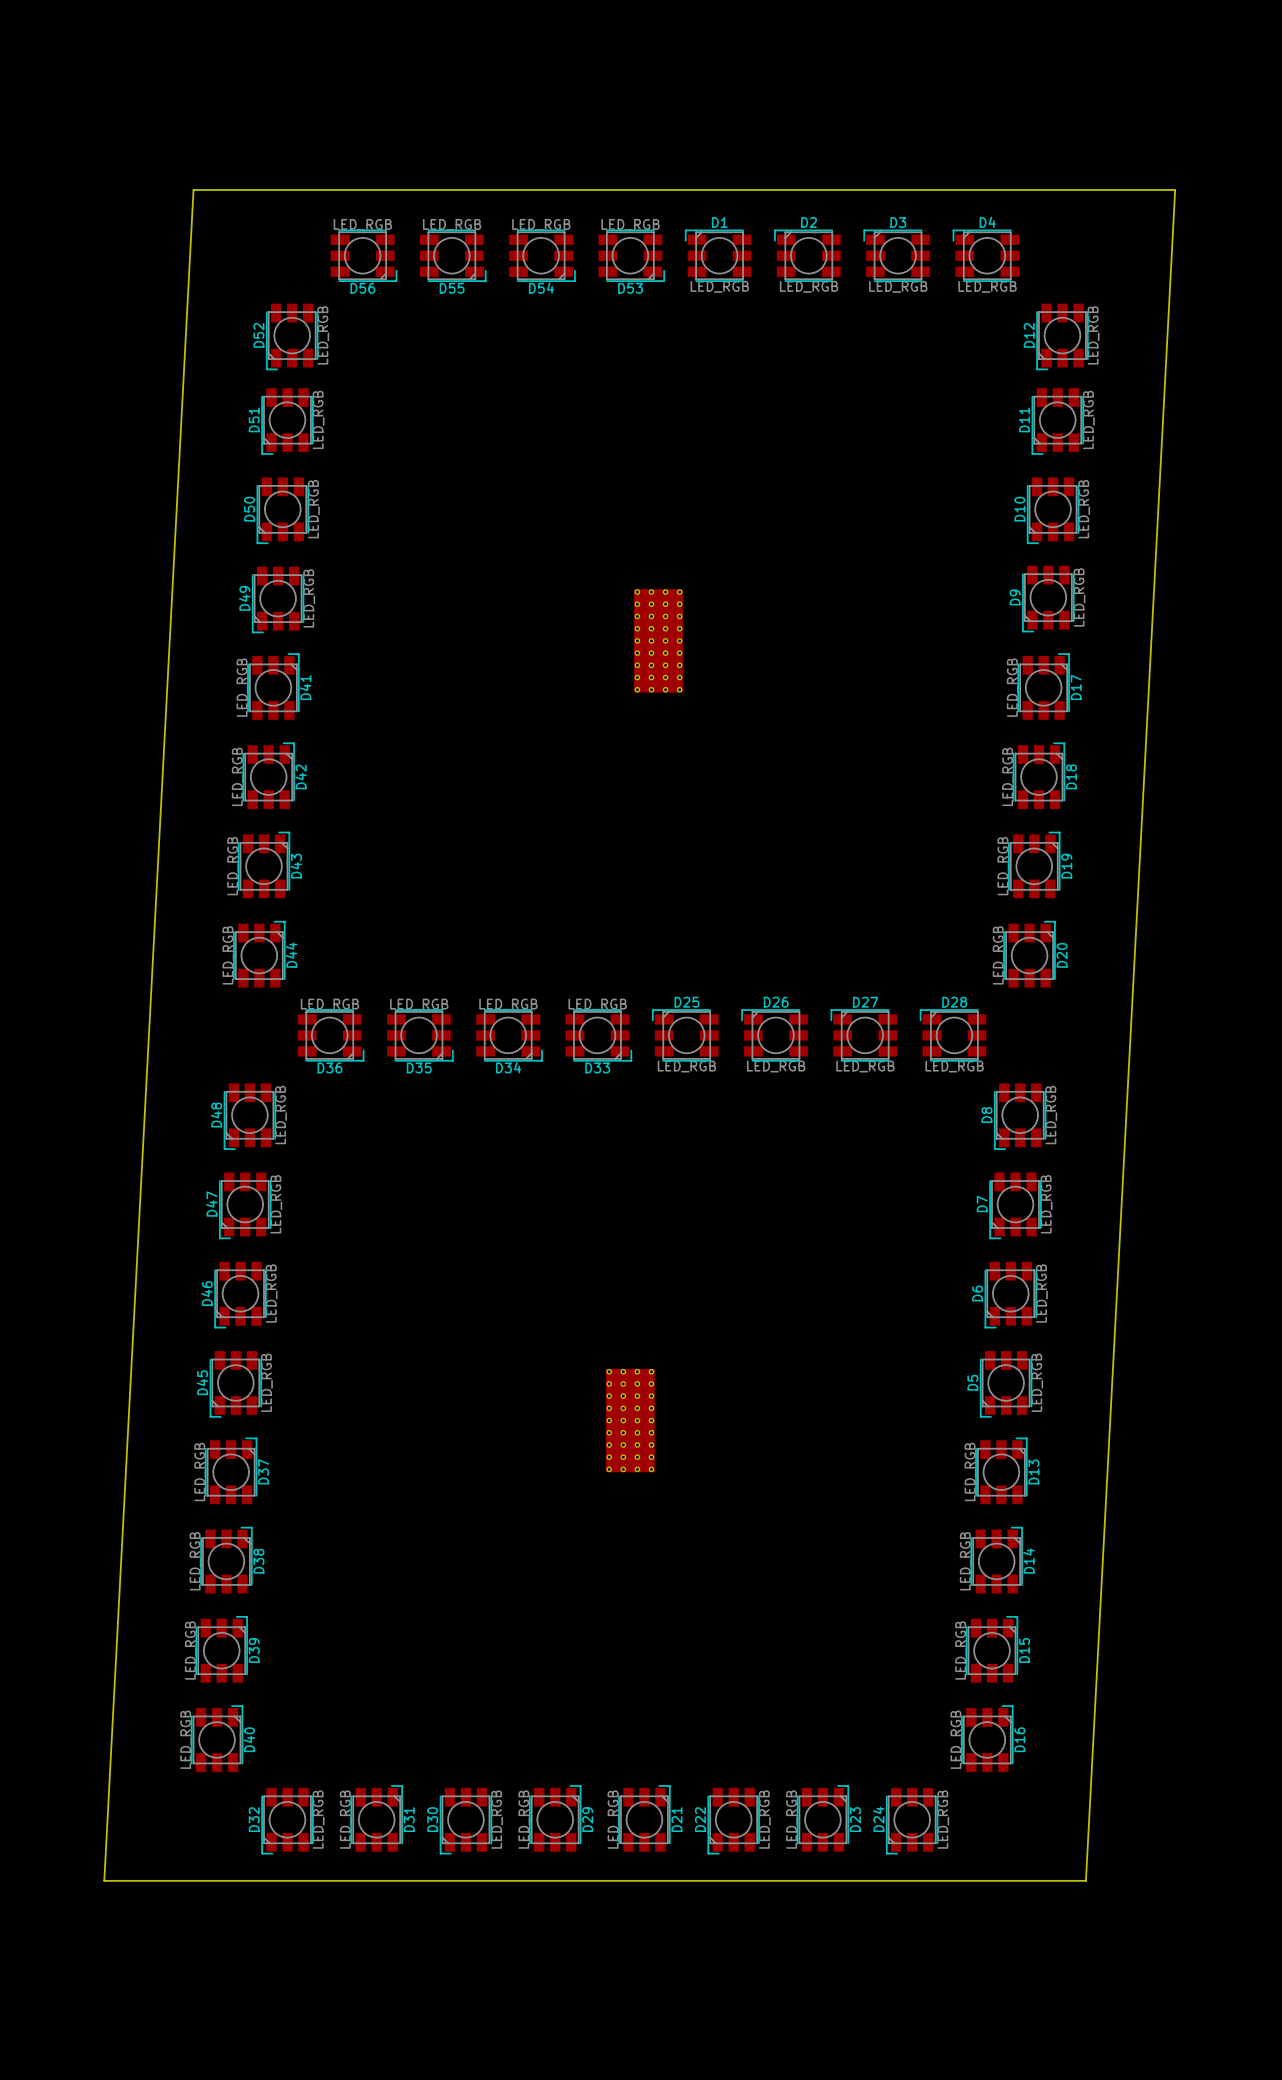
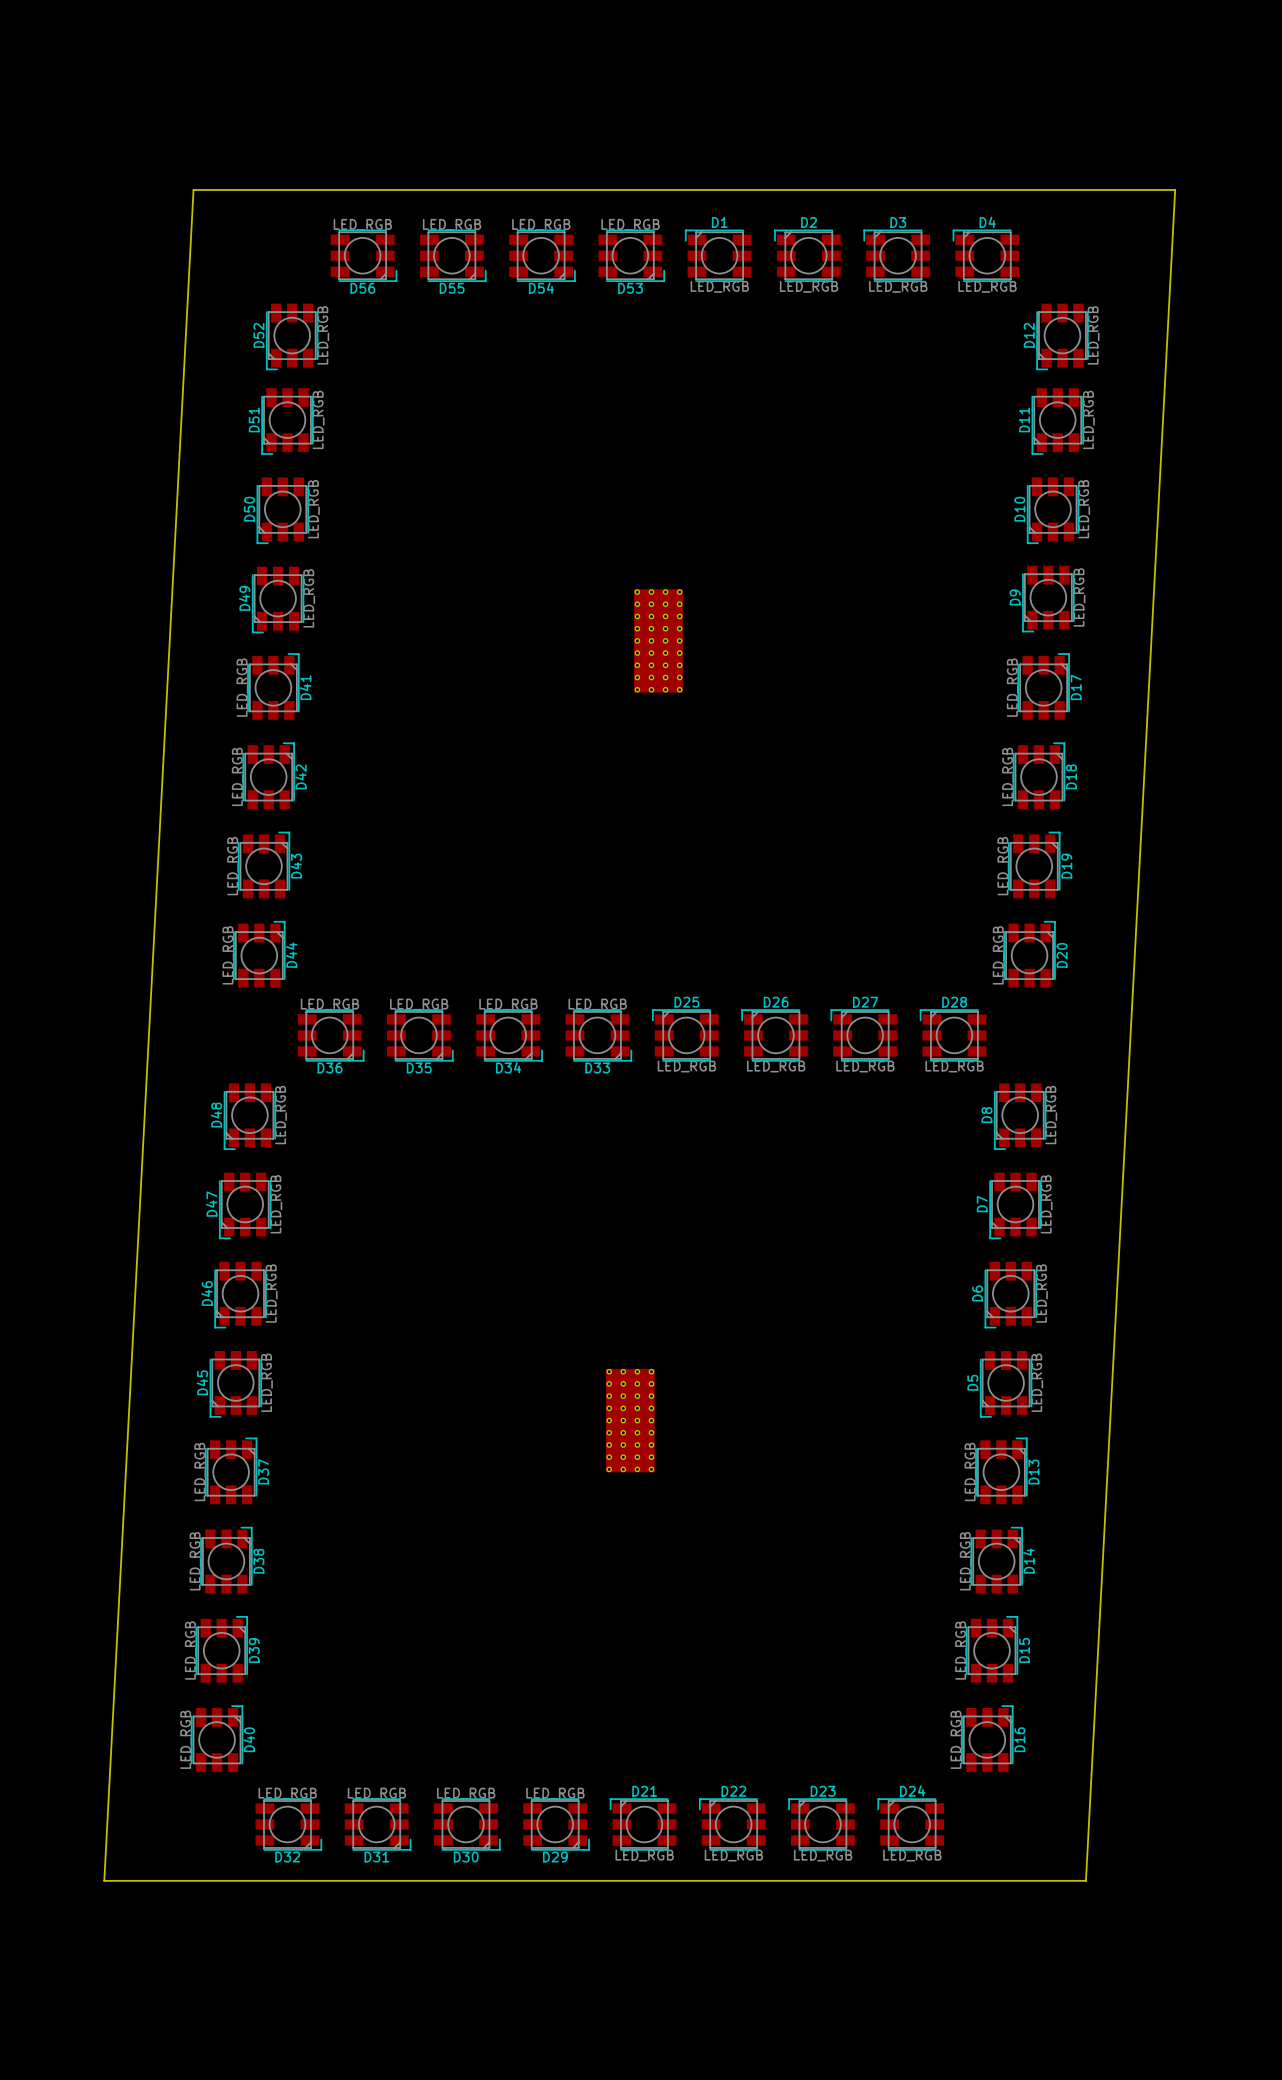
D31 rotation: 0° (376, 1818) -> 90° clockwise (377, 1824)
D29 rotation: 0° (555, 1818) -> 90° clockwise (556, 1824)
D21 rotation: 0° (644, 1818) -> 90° counterclockwise (643, 1824)
D23 rotation: 0° (822, 1818) -> 90° counterclockwise (821, 1824)
D32 rotation: 0° (287, 1821) -> 90° counterclockwise (288, 1824)
D30 rotation: 0° (465, 1821) -> 90° counterclockwise (467, 1824)
D22 rotation: 0° (733, 1821) -> 90° clockwise (732, 1824)
D24 rotation: 0° (912, 1821) -> 90° clockwise (910, 1824)

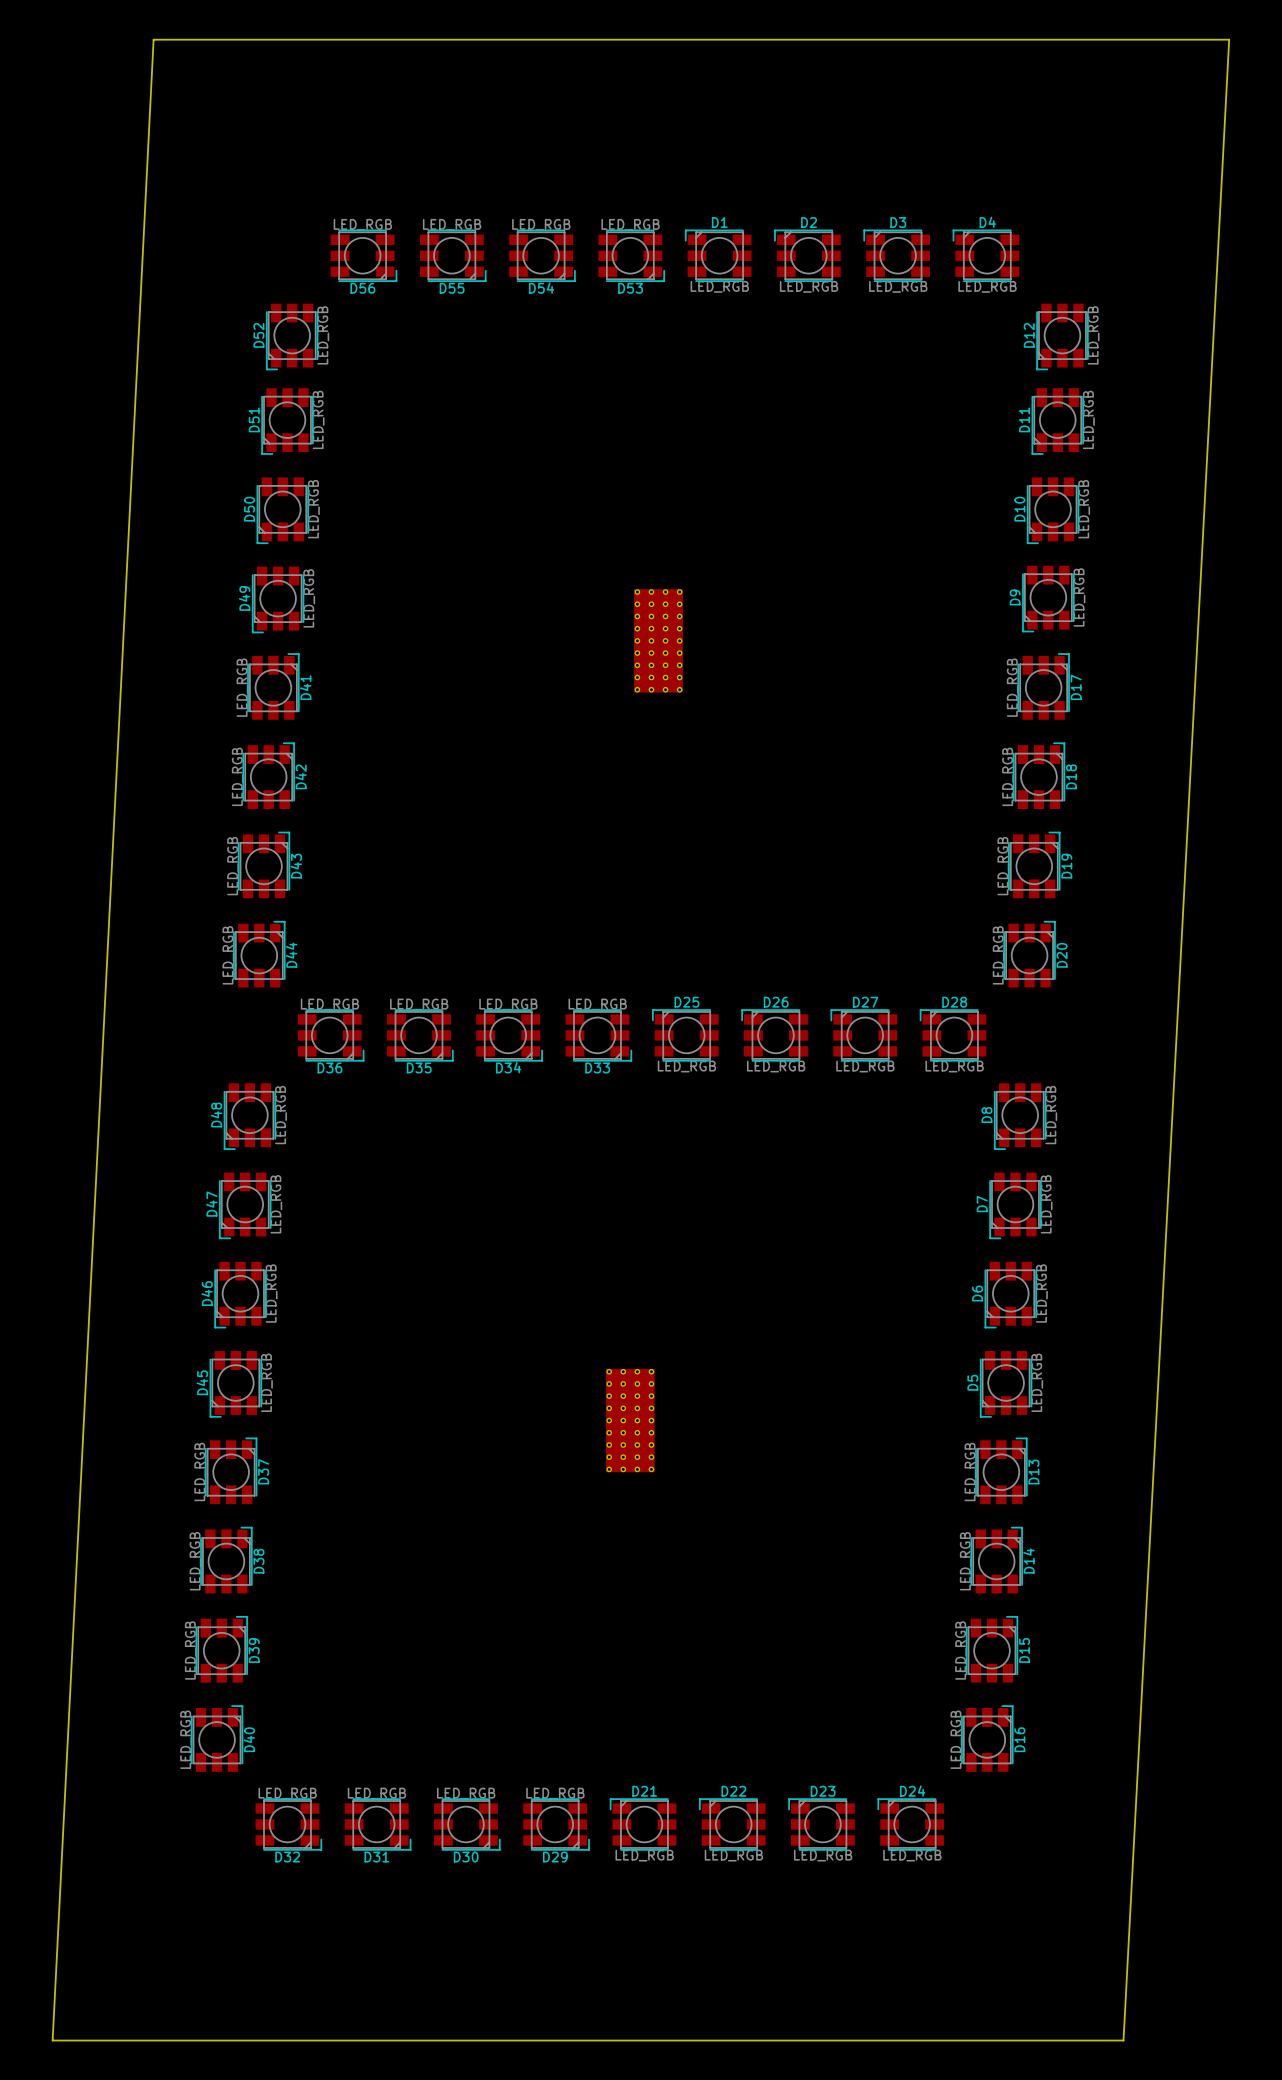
board edge: (193, 189) (1175, 189) (1085, 1880) (104, 1880) (193, 189) -> (153, 39) (52, 2040) (1123, 2040) (1229, 39) (153, 39)

